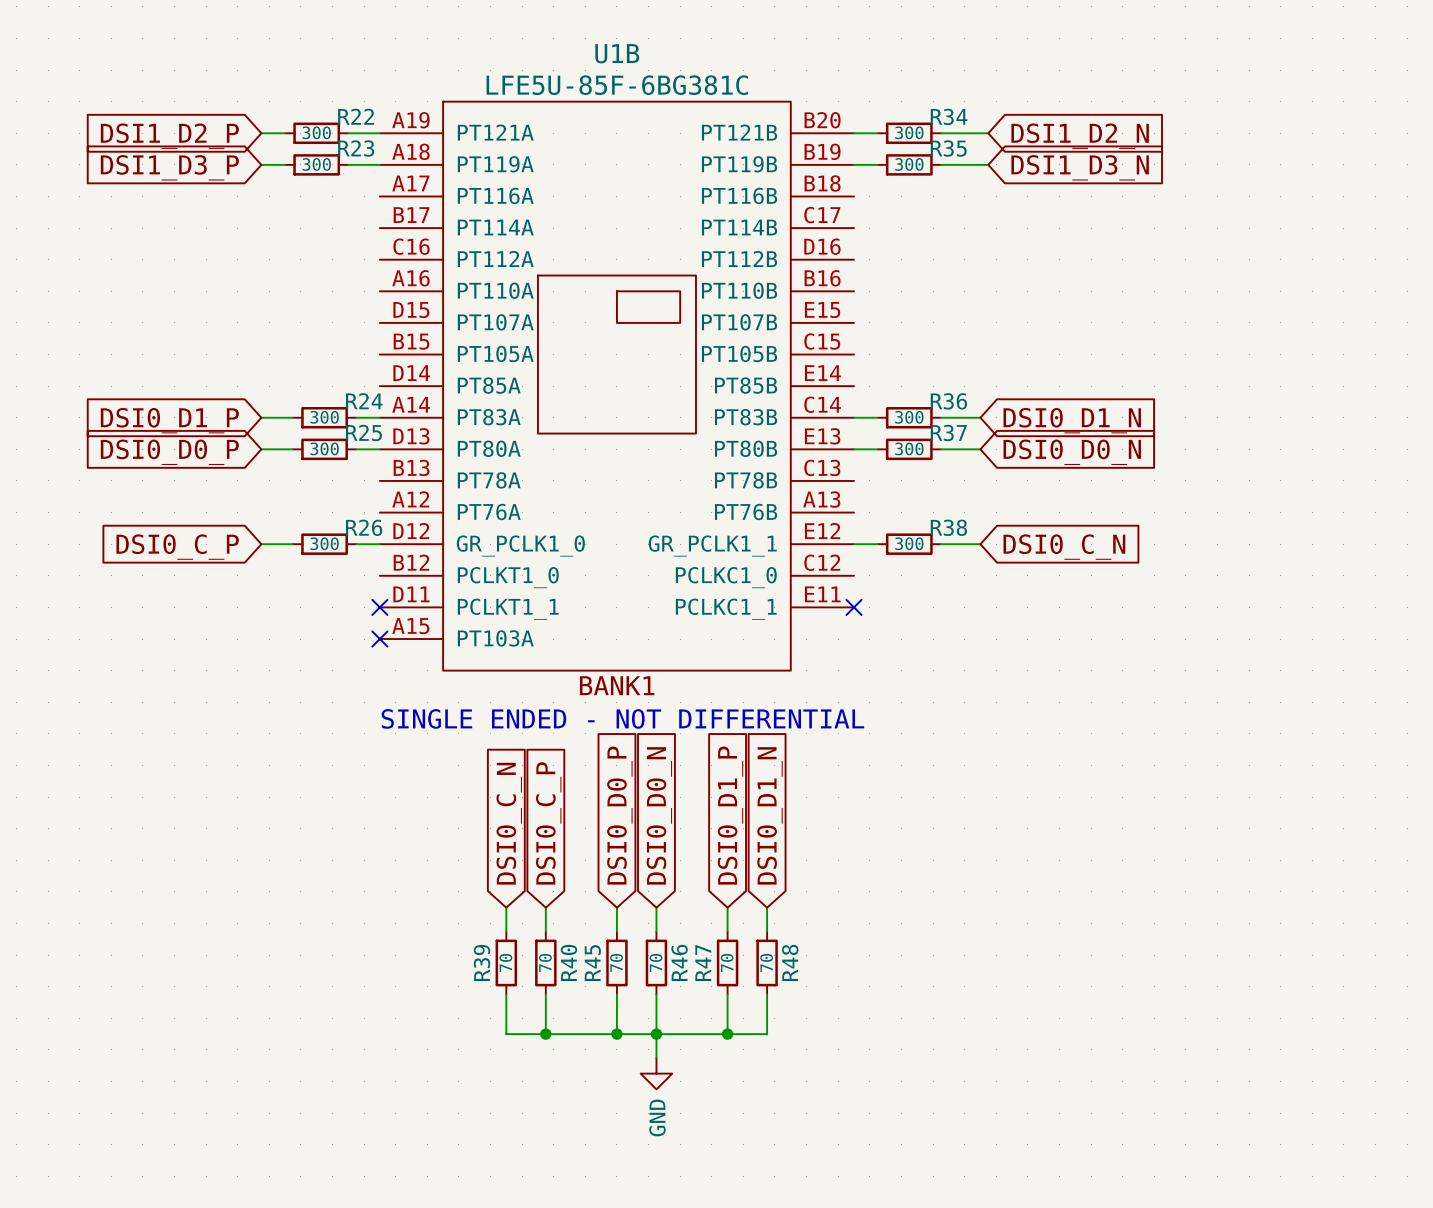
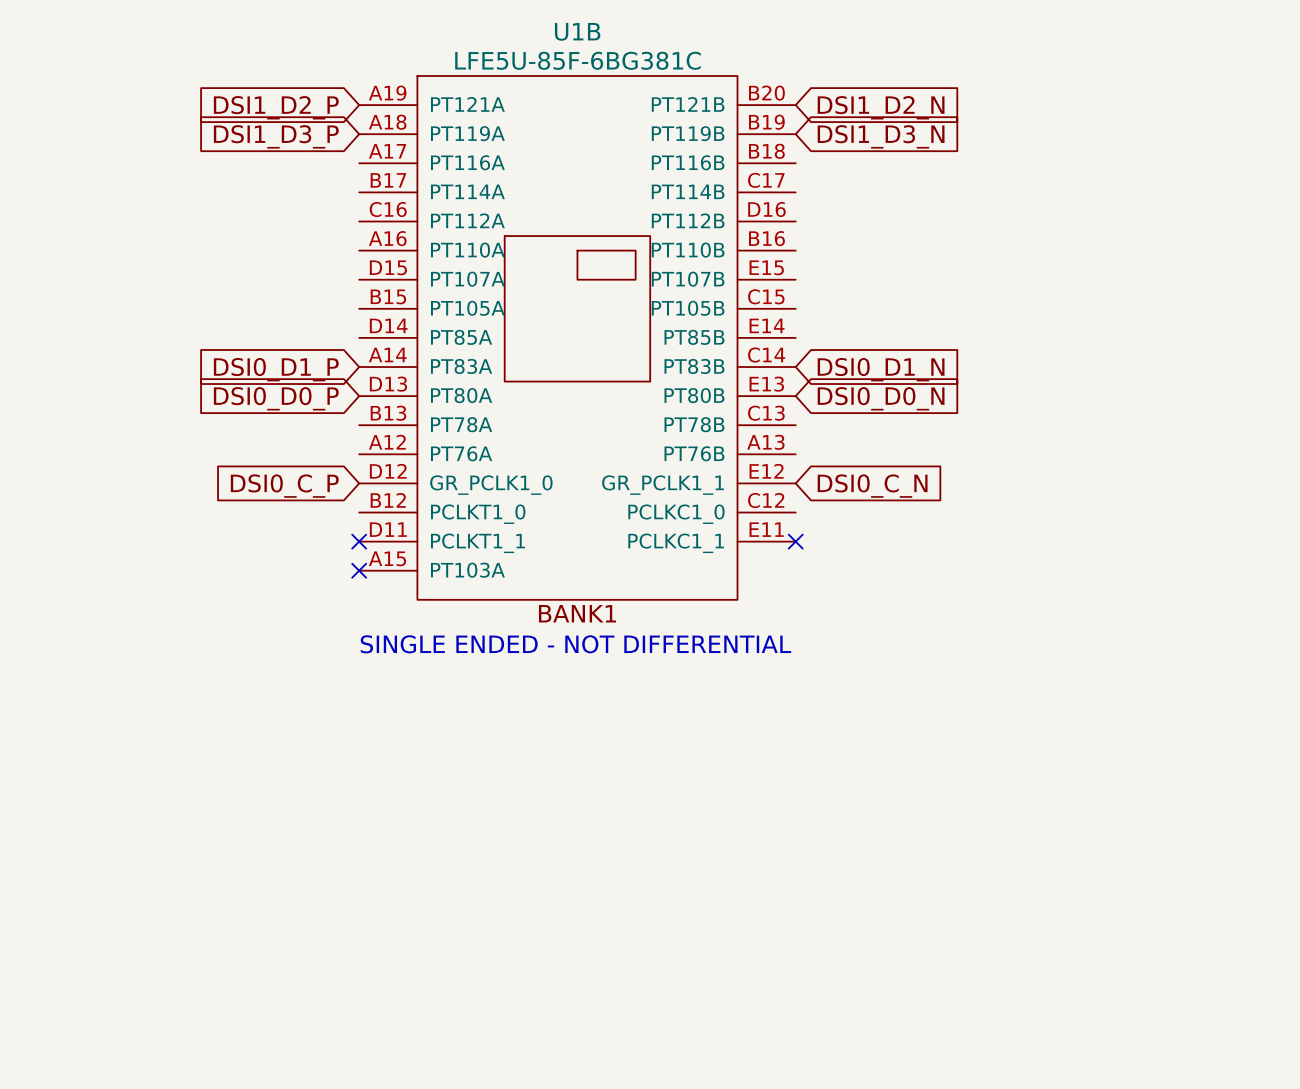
wire: (261, 133) (285, 133) -> none
R22: 300 (316, 133) -> none
wire: (348, 133) (379, 133) -> none
wire: (854, 133) (877, 133) -> none
R34: 300 (909, 133) -> none
wire: (940, 133) (988, 133) -> none
global label position: DSI1_D2_P (169, 136) -> DSI1_D2_P (276, 107)
global label position: DSI1_D2_N (1080, 136) -> DSI1_D2_N (881, 107)
wire: (261, 164) (285, 164) -> none
R23: 300 (316, 164) -> none
wire: (348, 164) (379, 164) -> none
wire: (854, 164) (877, 164) -> none
R35: 300 (909, 164) -> none
wire: (940, 164) (988, 164) -> none
global label position: DSI1_D3_P (169, 167) -> DSI1_D3_P (276, 136)
global label position: DSI1_D3_N (1080, 167) -> DSI1_D3_N (881, 136)
wire: (261, 417) (292, 417) -> none
R24: 300 (324, 417) -> none
wire: (356, 417) (379, 417) -> none
wire: (854, 417) (877, 417) -> none
R36: 300 (909, 417) -> none
wire: (940, 417) (980, 417) -> none
global label position: DSI0_D1_P (169, 420) -> DSI0_D1_P (276, 369)
global label position: DSI0_D1_N (1072, 420) -> DSI0_D1_N (881, 369)
wire: (261, 449) (292, 449) -> none
R25: 300 (324, 449) -> none
wire: (356, 449) (379, 449) -> none
wire: (854, 449) (877, 449) -> none
R37: 300 (909, 449) -> none
wire: (940, 449) (980, 449) -> none
global label position: DSI0_D0_P (169, 452) -> DSI0_D0_P (276, 398)
global label position: DSI0_D0_N (1072, 452) -> DSI0_D0_N (881, 398)
wire: (261, 544) (292, 544) -> none
R26: 300 (324, 544) -> none
wire: (356, 544) (379, 544) -> none
wire: (854, 544) (877, 544) -> none
R38: 300 (909, 544) -> none
wire: (940, 544) (980, 544) -> none
global label position: DSI0_C_P (177, 547) -> DSI0_C_P (284, 486)
global label position: DSI0_C_N (1064, 547) -> DSI0_C_N (872, 486)
global label: DSI0_D0_P (619, 815) -> none
global label: DSI0_D0_N (659, 815) -> none
global label: DSI0_D1_P (730, 815) -> none
global label: DSI0_D1_N (769, 815) -> none
global label: DSI0_C_N (509, 823) -> none
global label: DSI0_C_P (548, 823) -> none
wire: (506, 907) (506, 931) -> none
wire: (545, 907) (545, 931) -> none
wire: (616, 907) (616, 931) -> none
wire: (656, 907) (656, 931) -> none
wire: (727, 907) (727, 931) -> none
wire: (767, 907) (767, 931) -> none
R39: 70 (506, 962) -> none
R40: 70 (545, 962) -> none
R45: 70 (616, 962) -> none
R46: 70 (656, 962) -> none
R47: 70 (727, 962) -> none
R48: 70 (767, 962) -> none
wire: (506, 994) (506, 1034) (767, 1034) (767, 994) -> none
wire: (545, 994) (545, 1034) -> none
wire: (616, 994) (616, 1034) -> none
wire: (656, 994) (656, 1057) -> none
wire: (727, 994) (727, 1034) -> none
junction: (545, 1034) -> none
junction: (616, 1034) -> none
junction: (656, 1034) -> none
junction: (727, 1034) -> none
power symbol: GND (656, 1073) -> none

